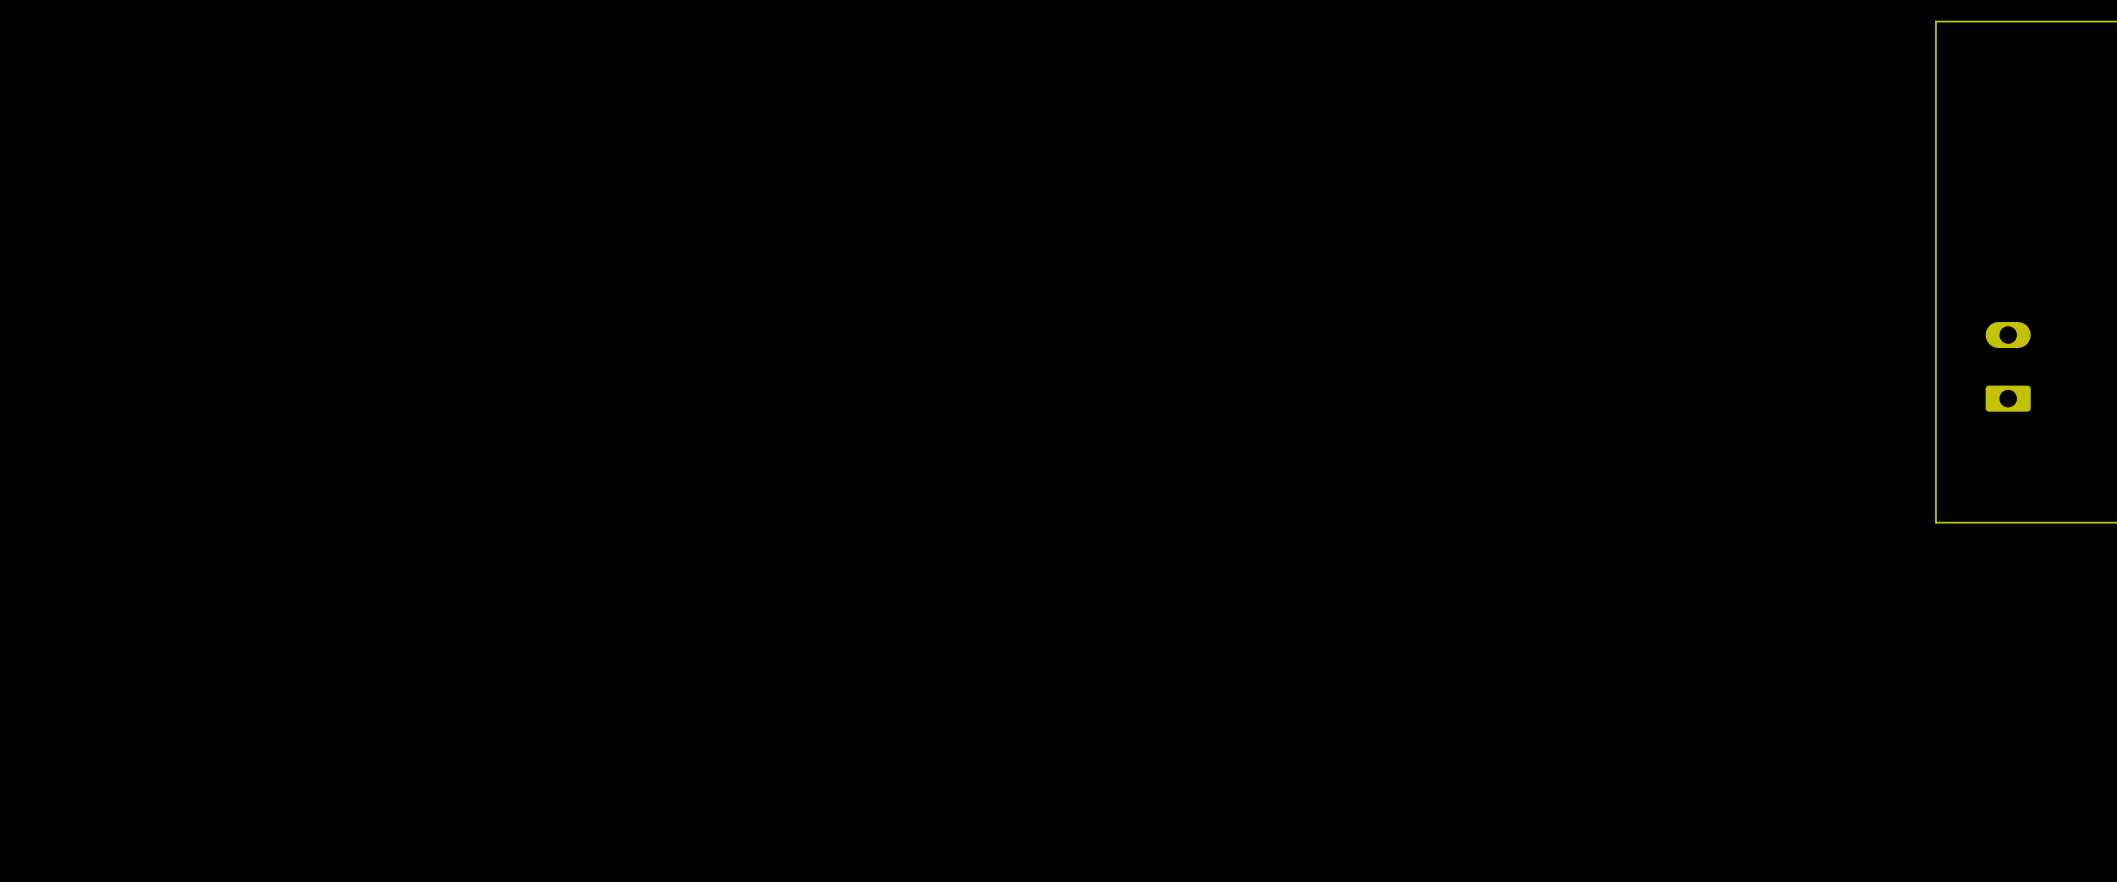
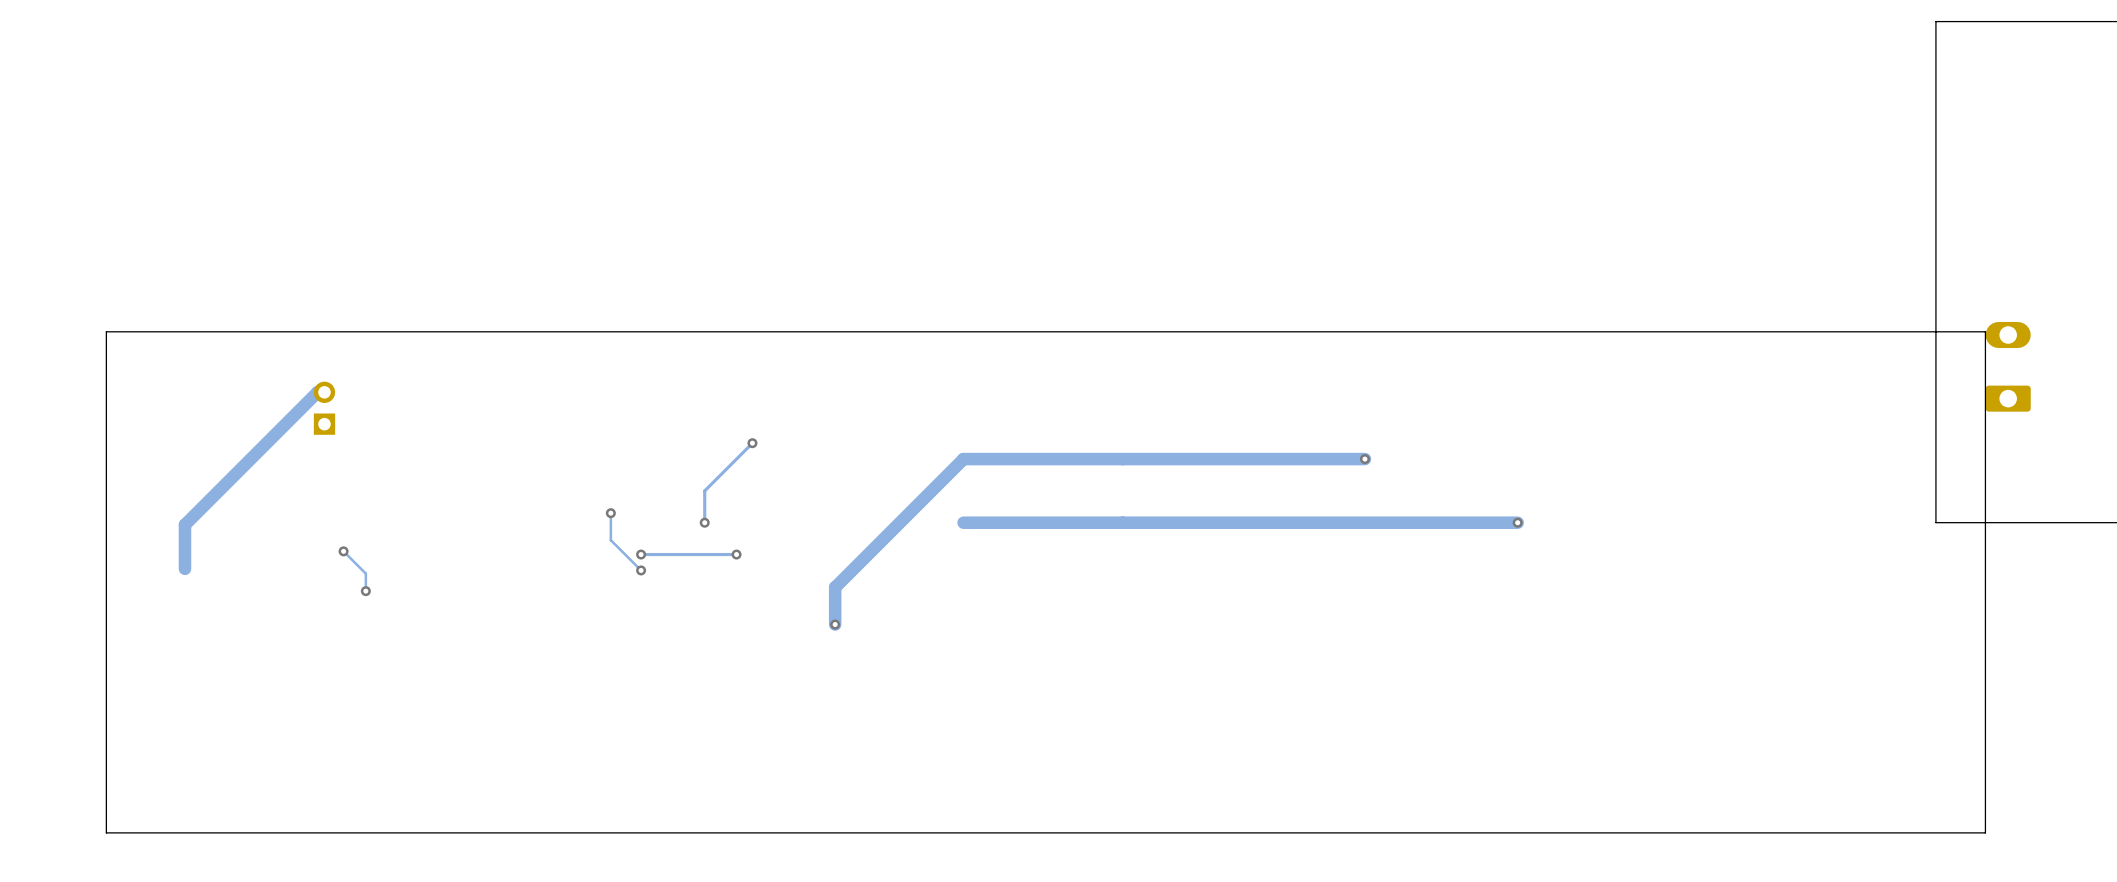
board edge: none -> (1985, 331) (106, 331) (106, 832) (1985, 832) (1985, 331)
track: none -> (324, 392) (317, 392) (184, 524) (184, 568)
part: none -> (324, 408)
track: none -> (752, 443) (704, 490) (704, 522)
via: none -> (752, 443)
track: none -> (1364, 459) (963, 459) (835, 587) (835, 624)
via: none -> (1364, 459)
track: none -> (610, 513) (610, 540) (641, 570)
via: none -> (610, 513)
via: none -> (704, 522)
track: none -> (1517, 522) (963, 522)
via: none -> (1517, 522)
track: none -> (343, 551) (365, 573) (365, 591)
via: none -> (343, 551)
via: none -> (641, 554)
track: none -> (736, 554) (641, 554)
via: none -> (736, 554)
via: none -> (641, 570)
via: none -> (365, 591)
via: none -> (835, 624)

